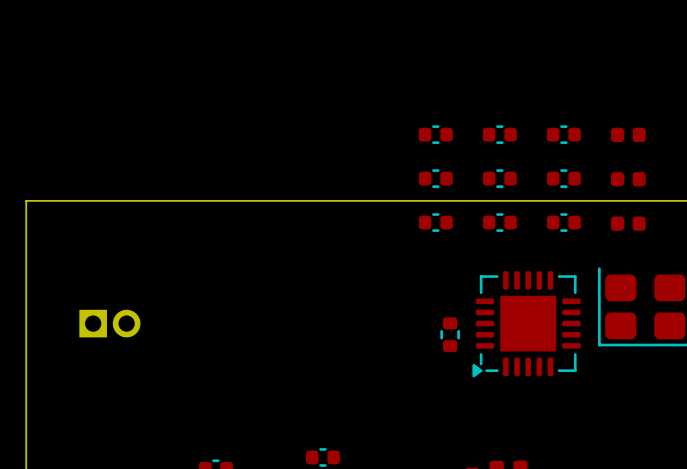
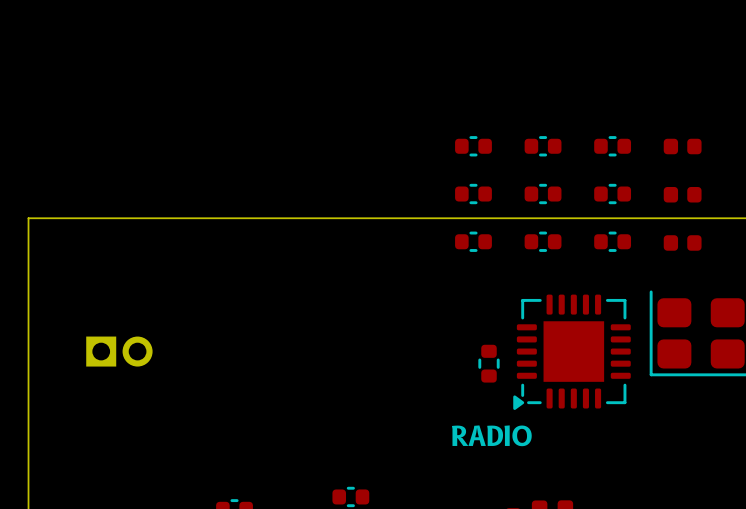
text: none -> RADIO (491, 435)

